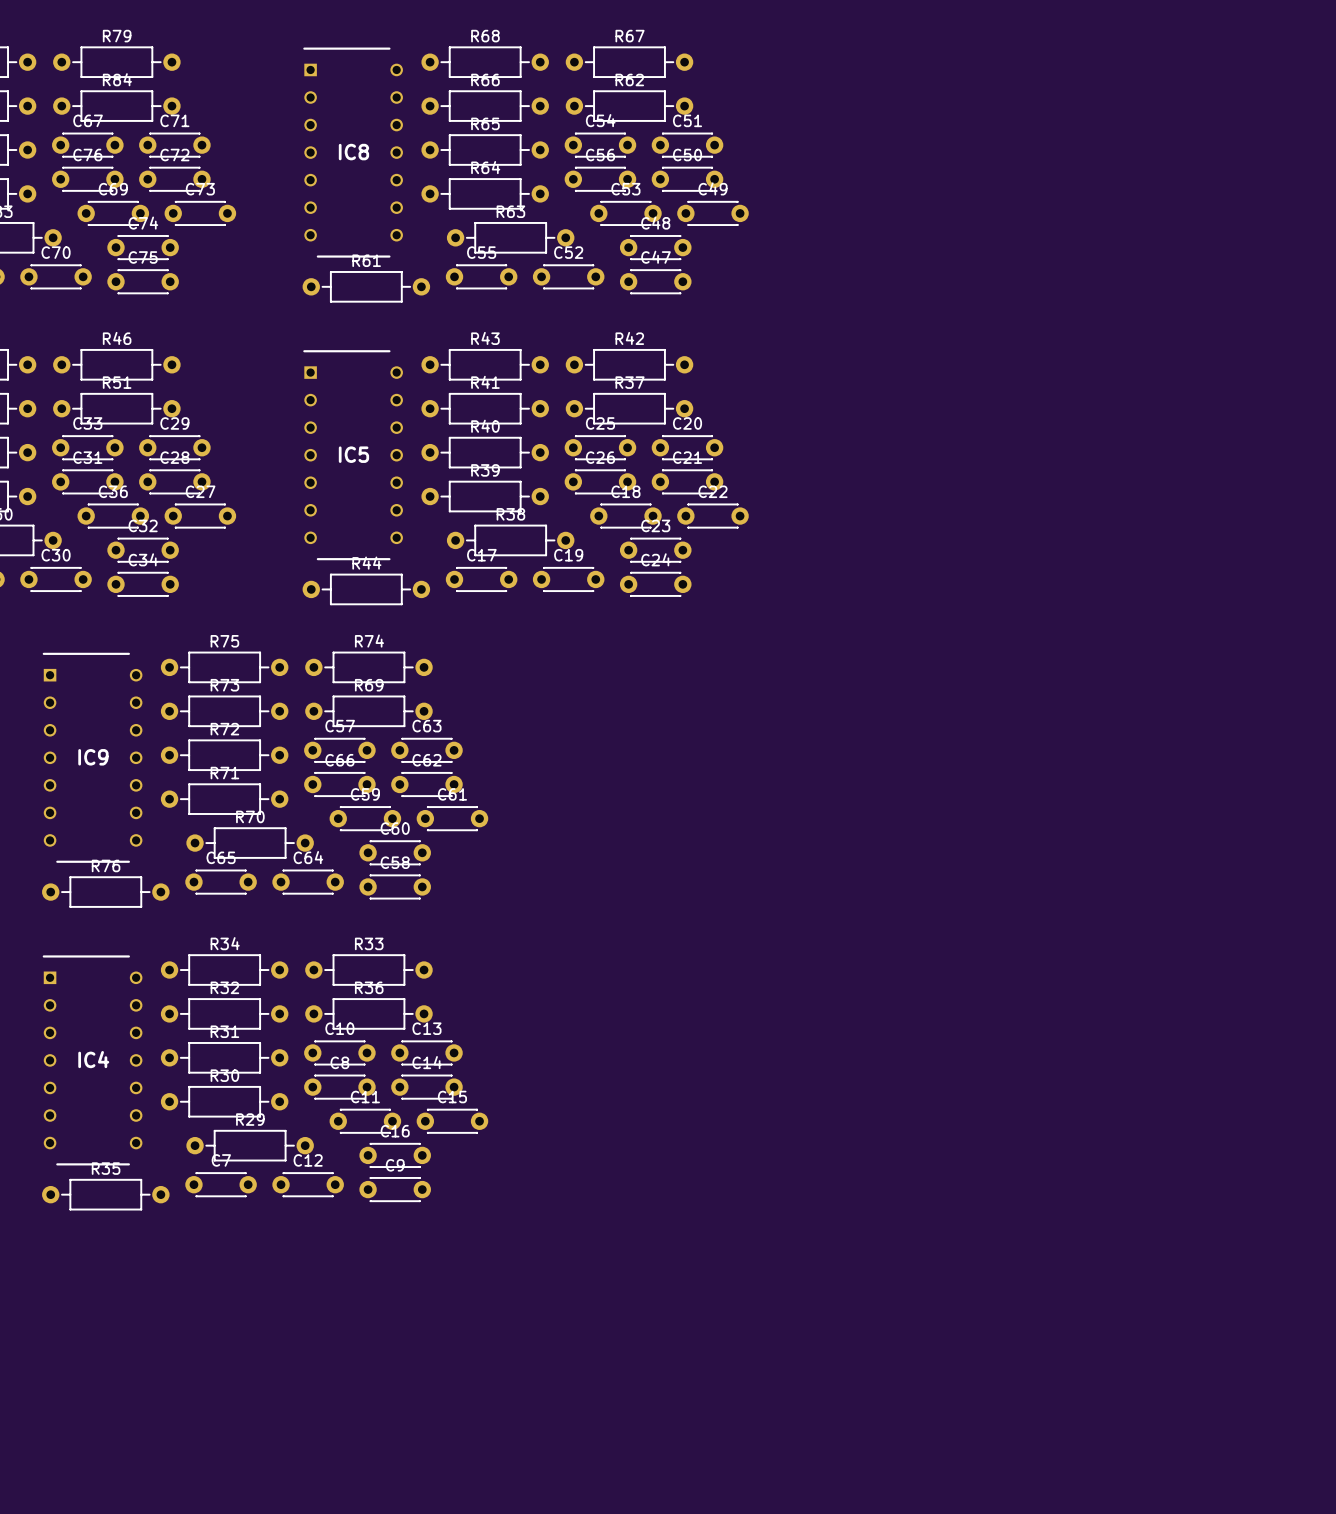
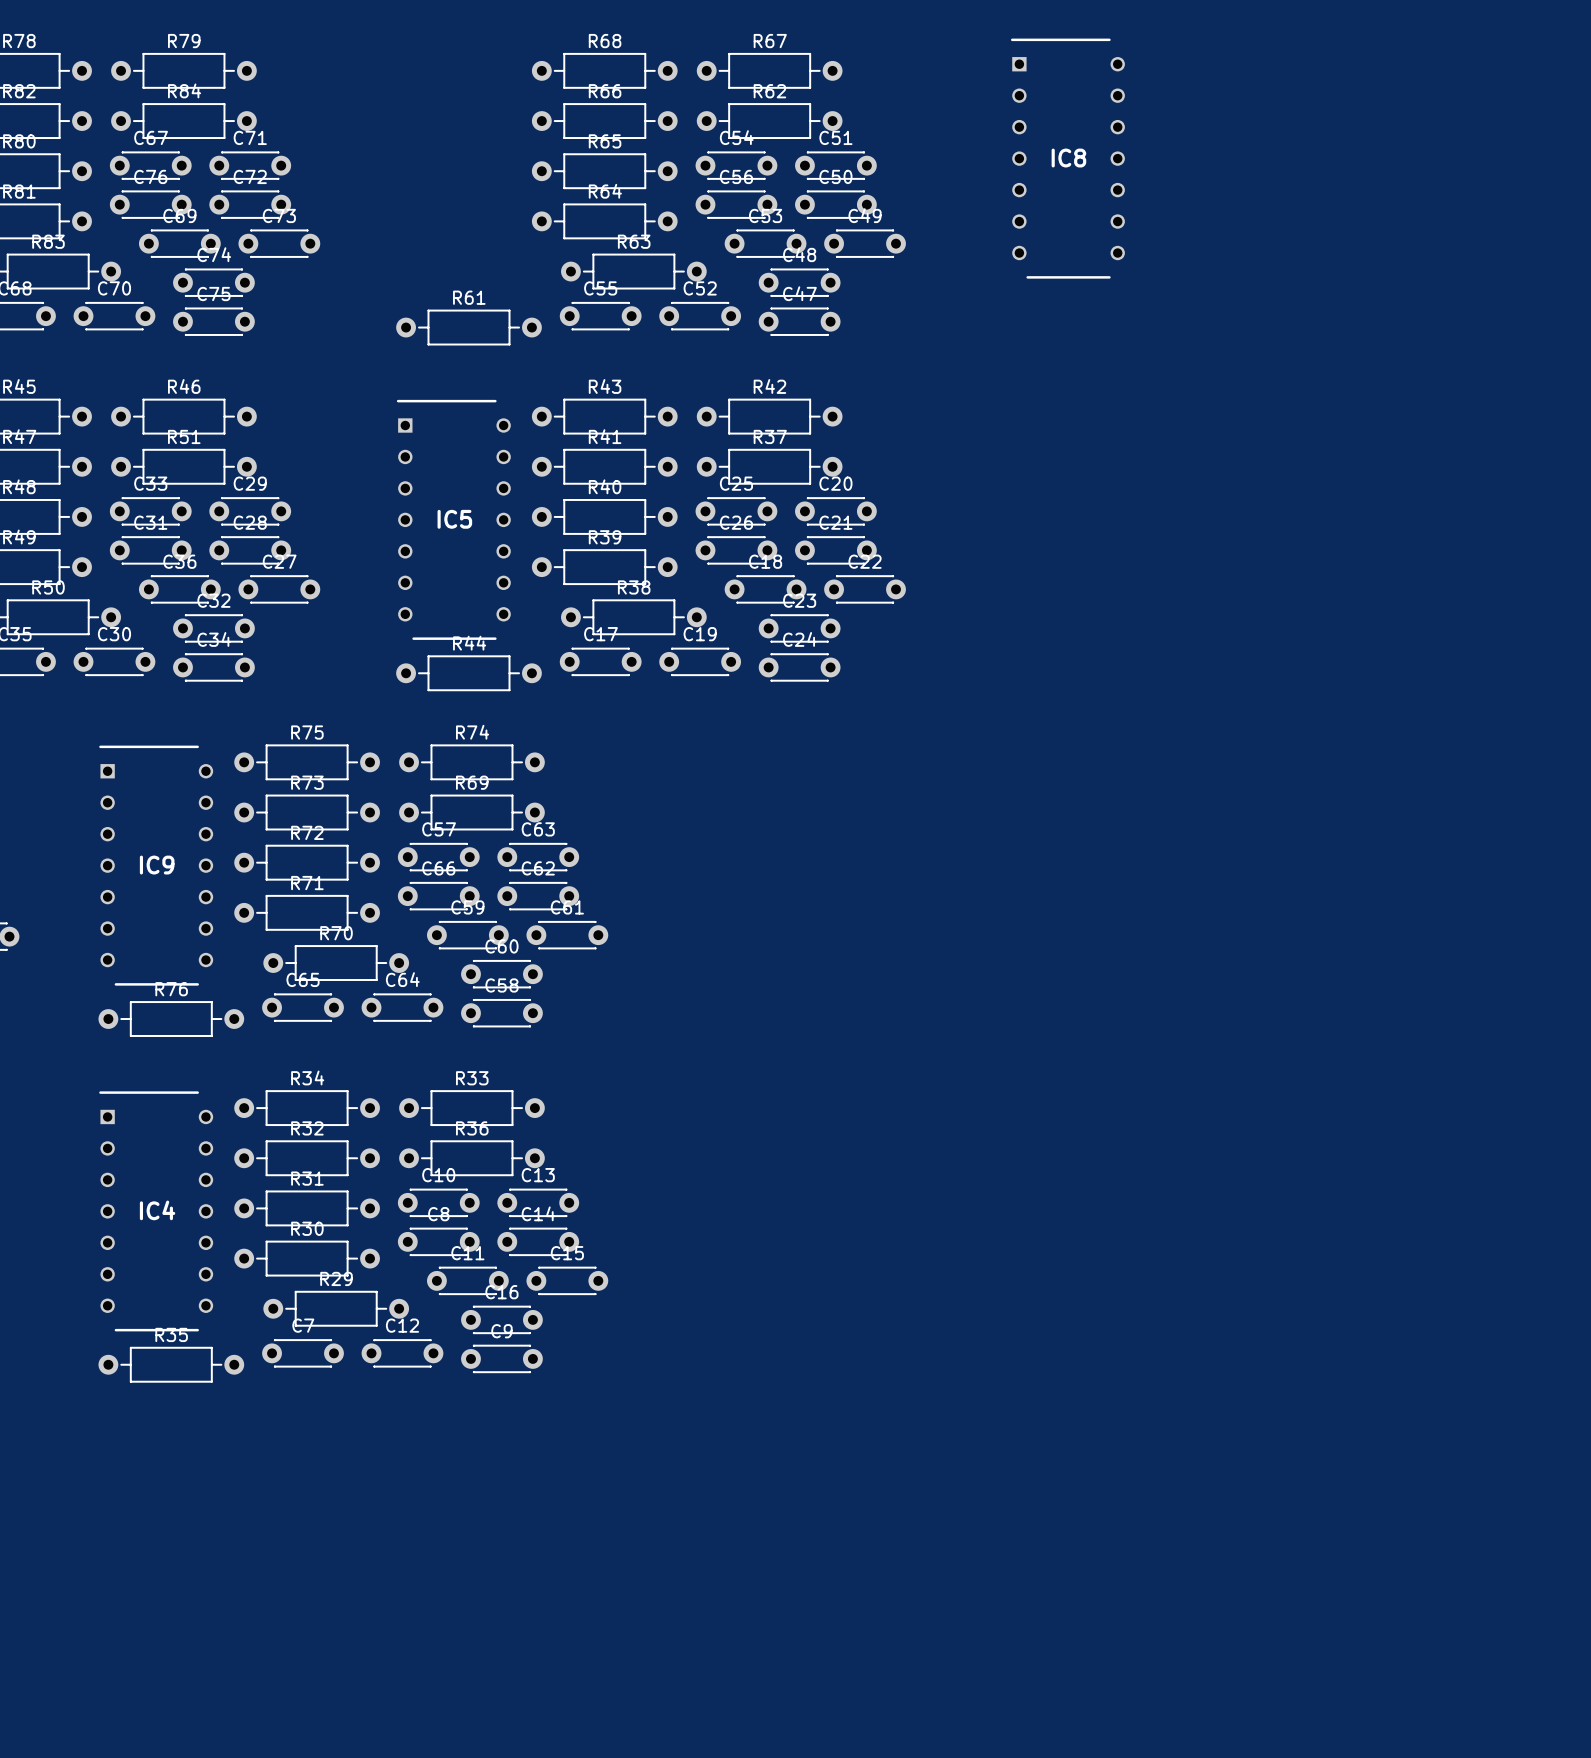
IC8 position: (353, 152) -> (1067, 158)

